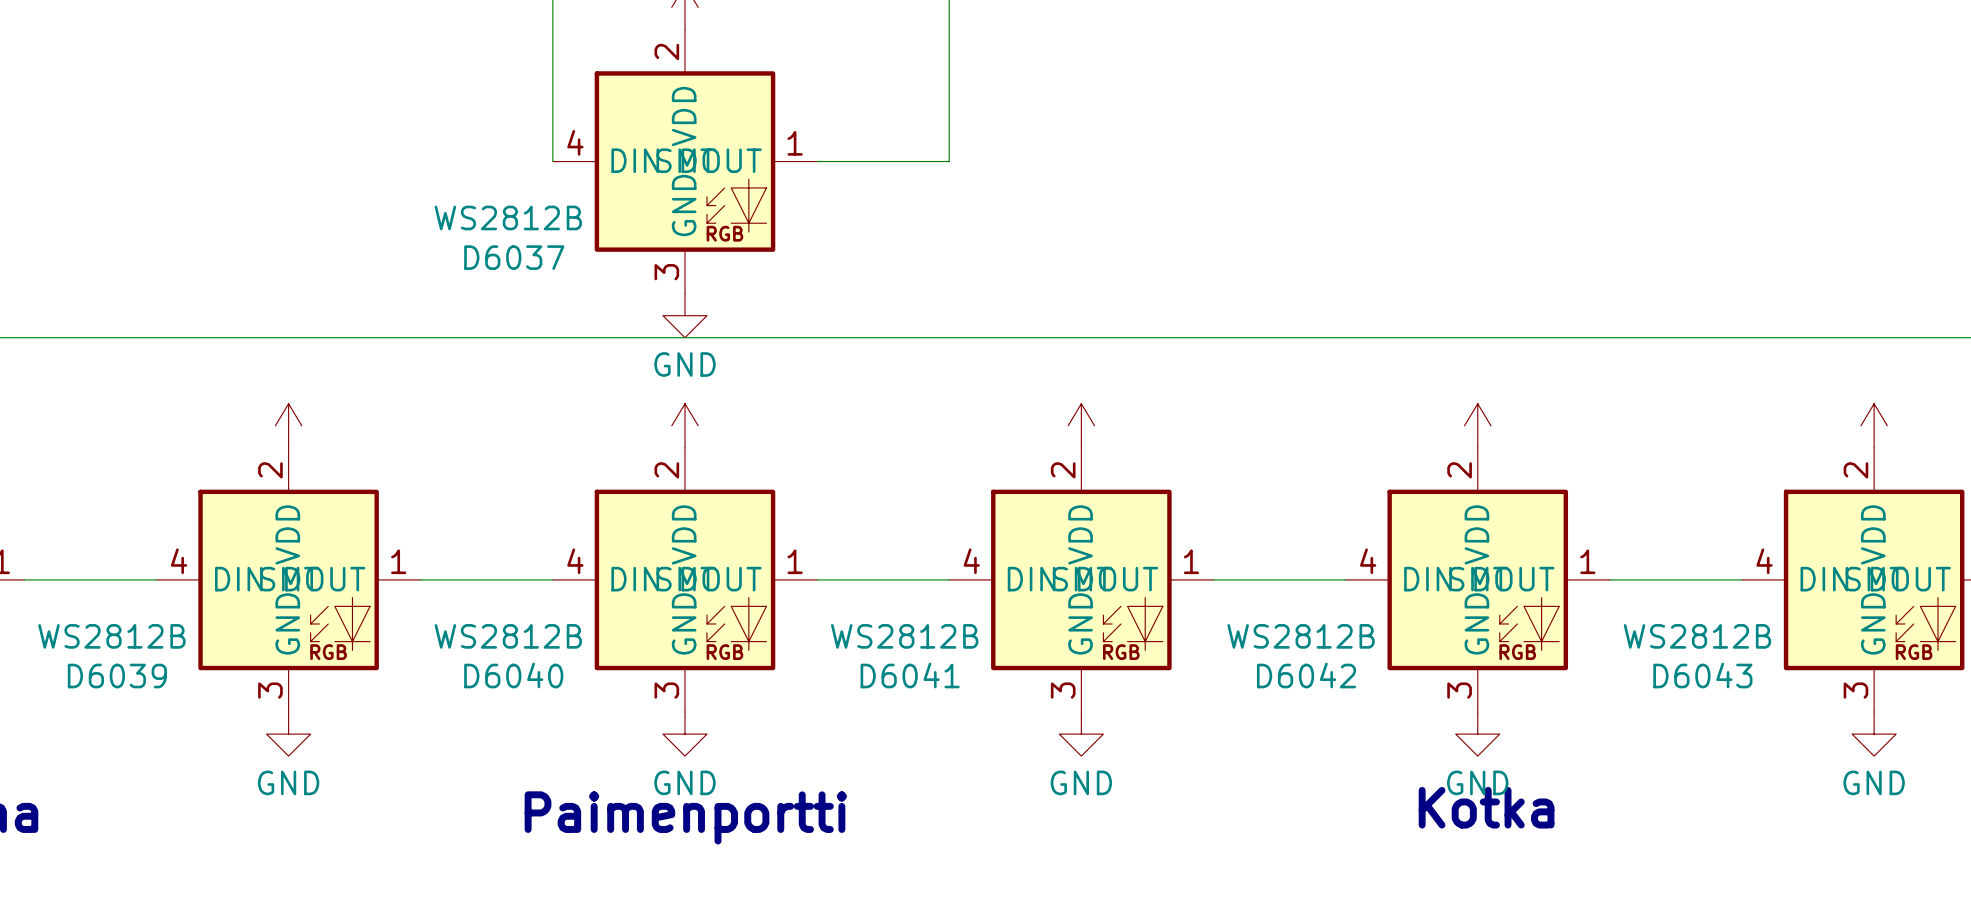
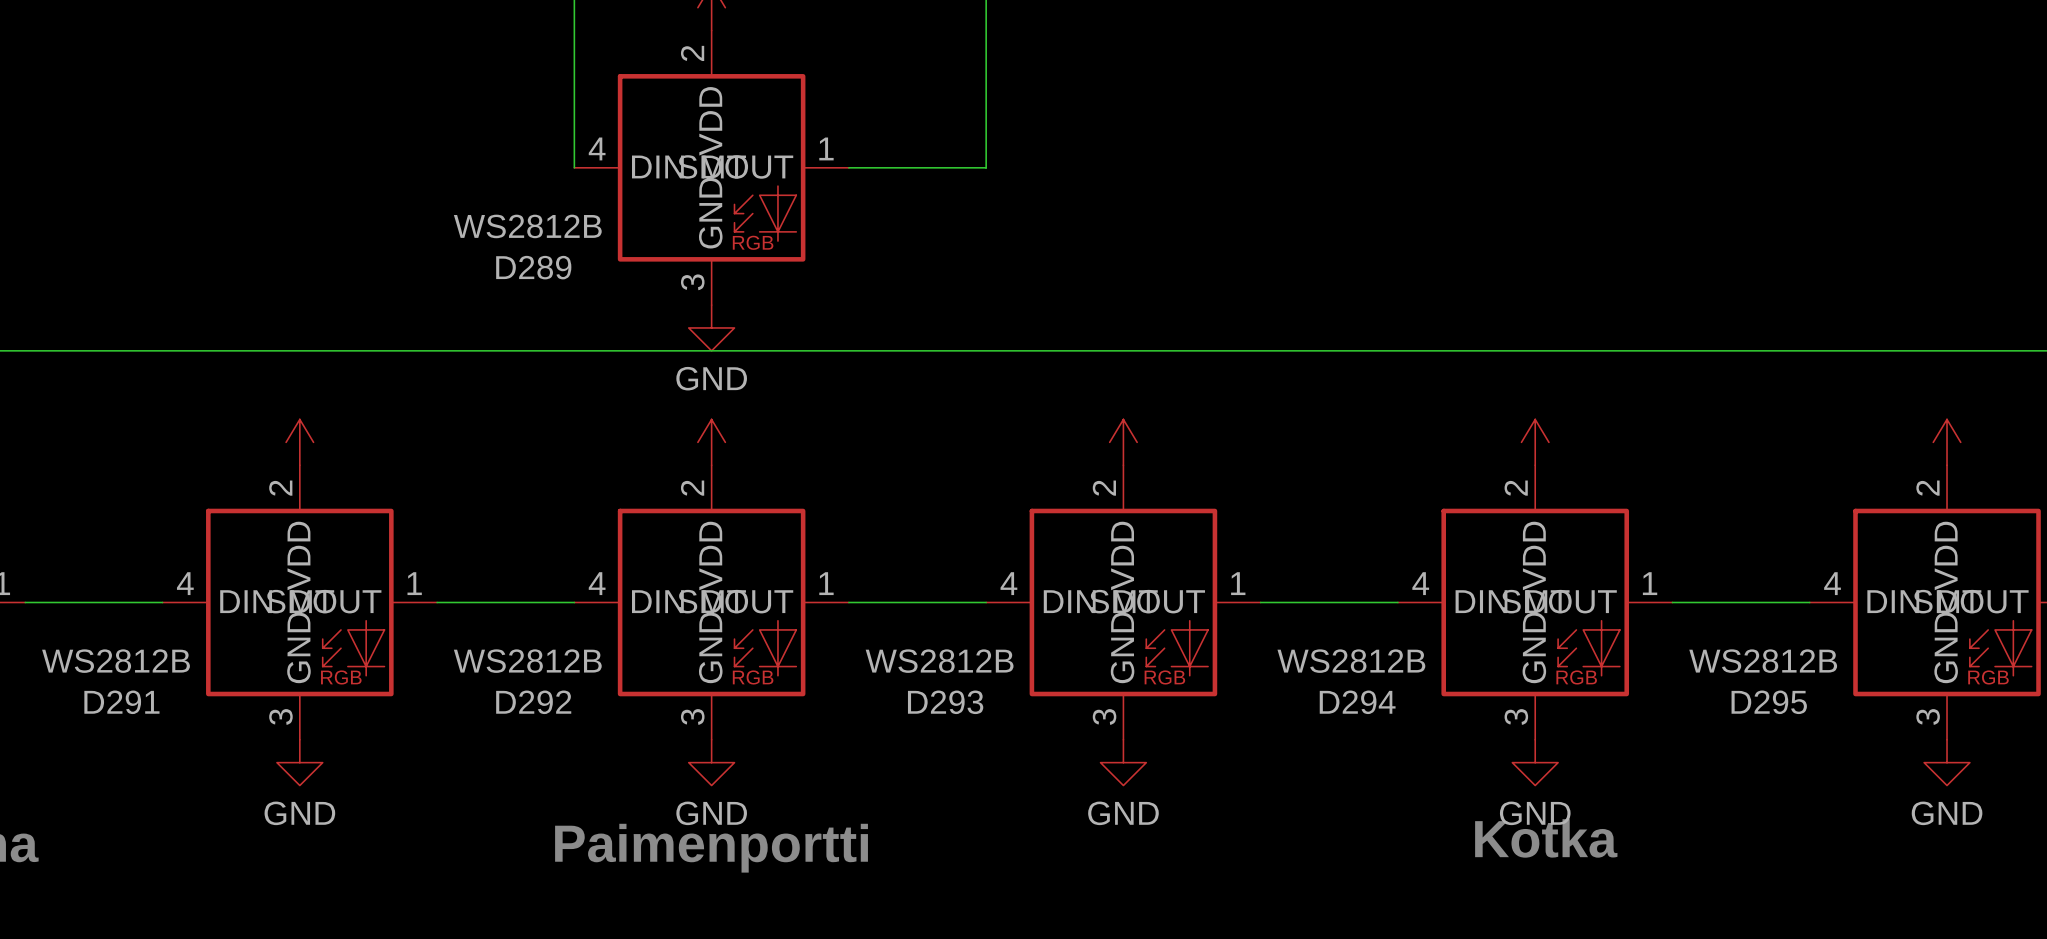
D6037 name: D6037 (514, 257) -> D289 (533, 267)
D6040 name: D6040 (513, 675) -> D292 (533, 702)
D6041 name: D6041 (910, 675) -> D293 (945, 702)
D6042 name: D6042 (1306, 675) -> D294 (1357, 702)
D6043 name: D6043 (1702, 675) -> D295 (1769, 702)
D6039 name: D6039 (117, 676) -> D291 (121, 702)

